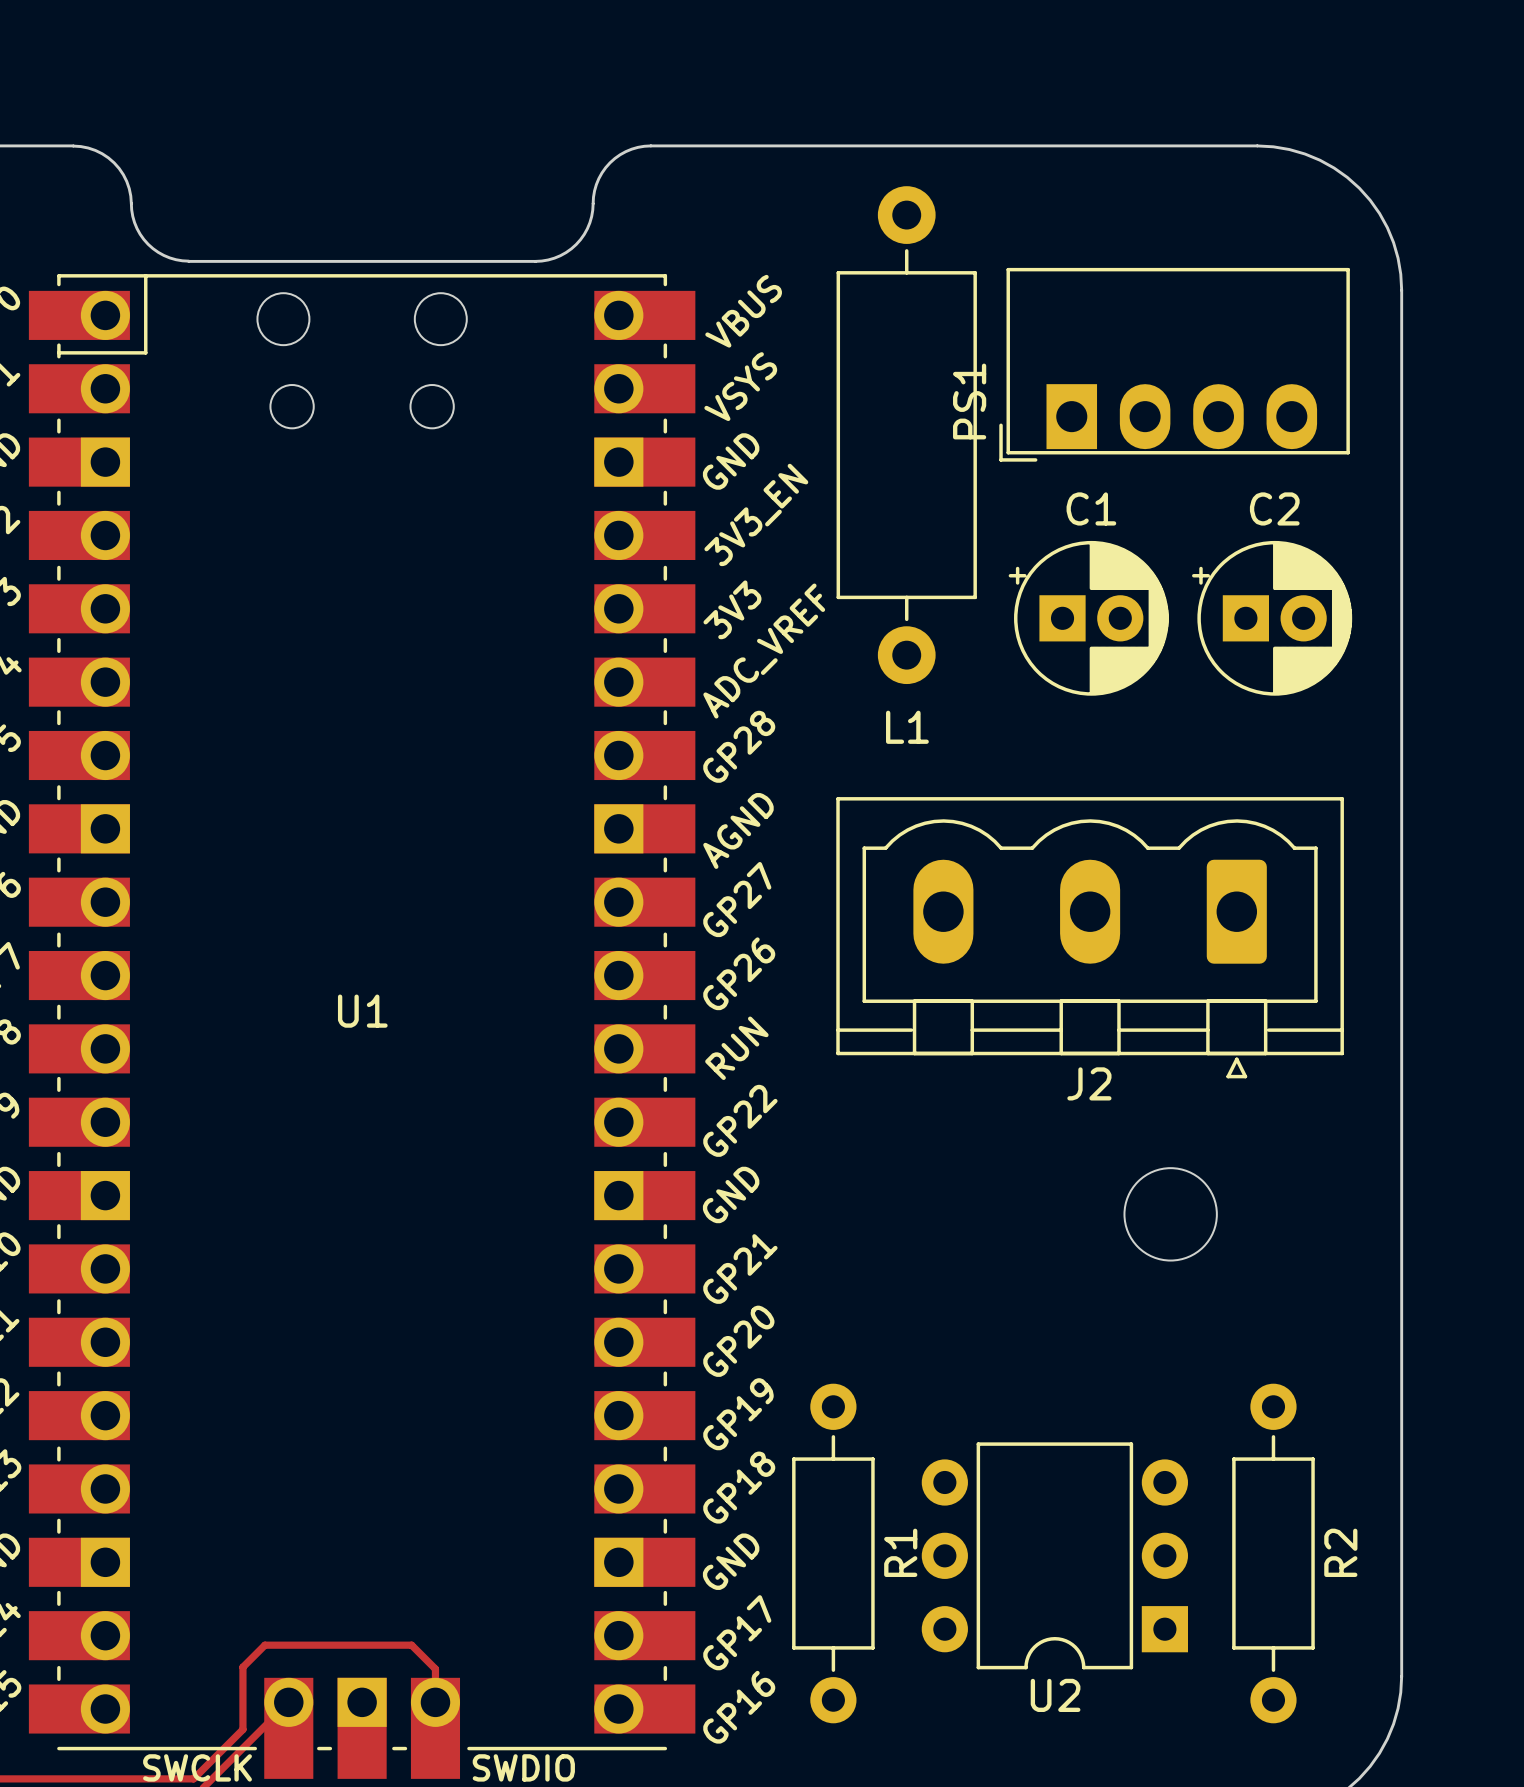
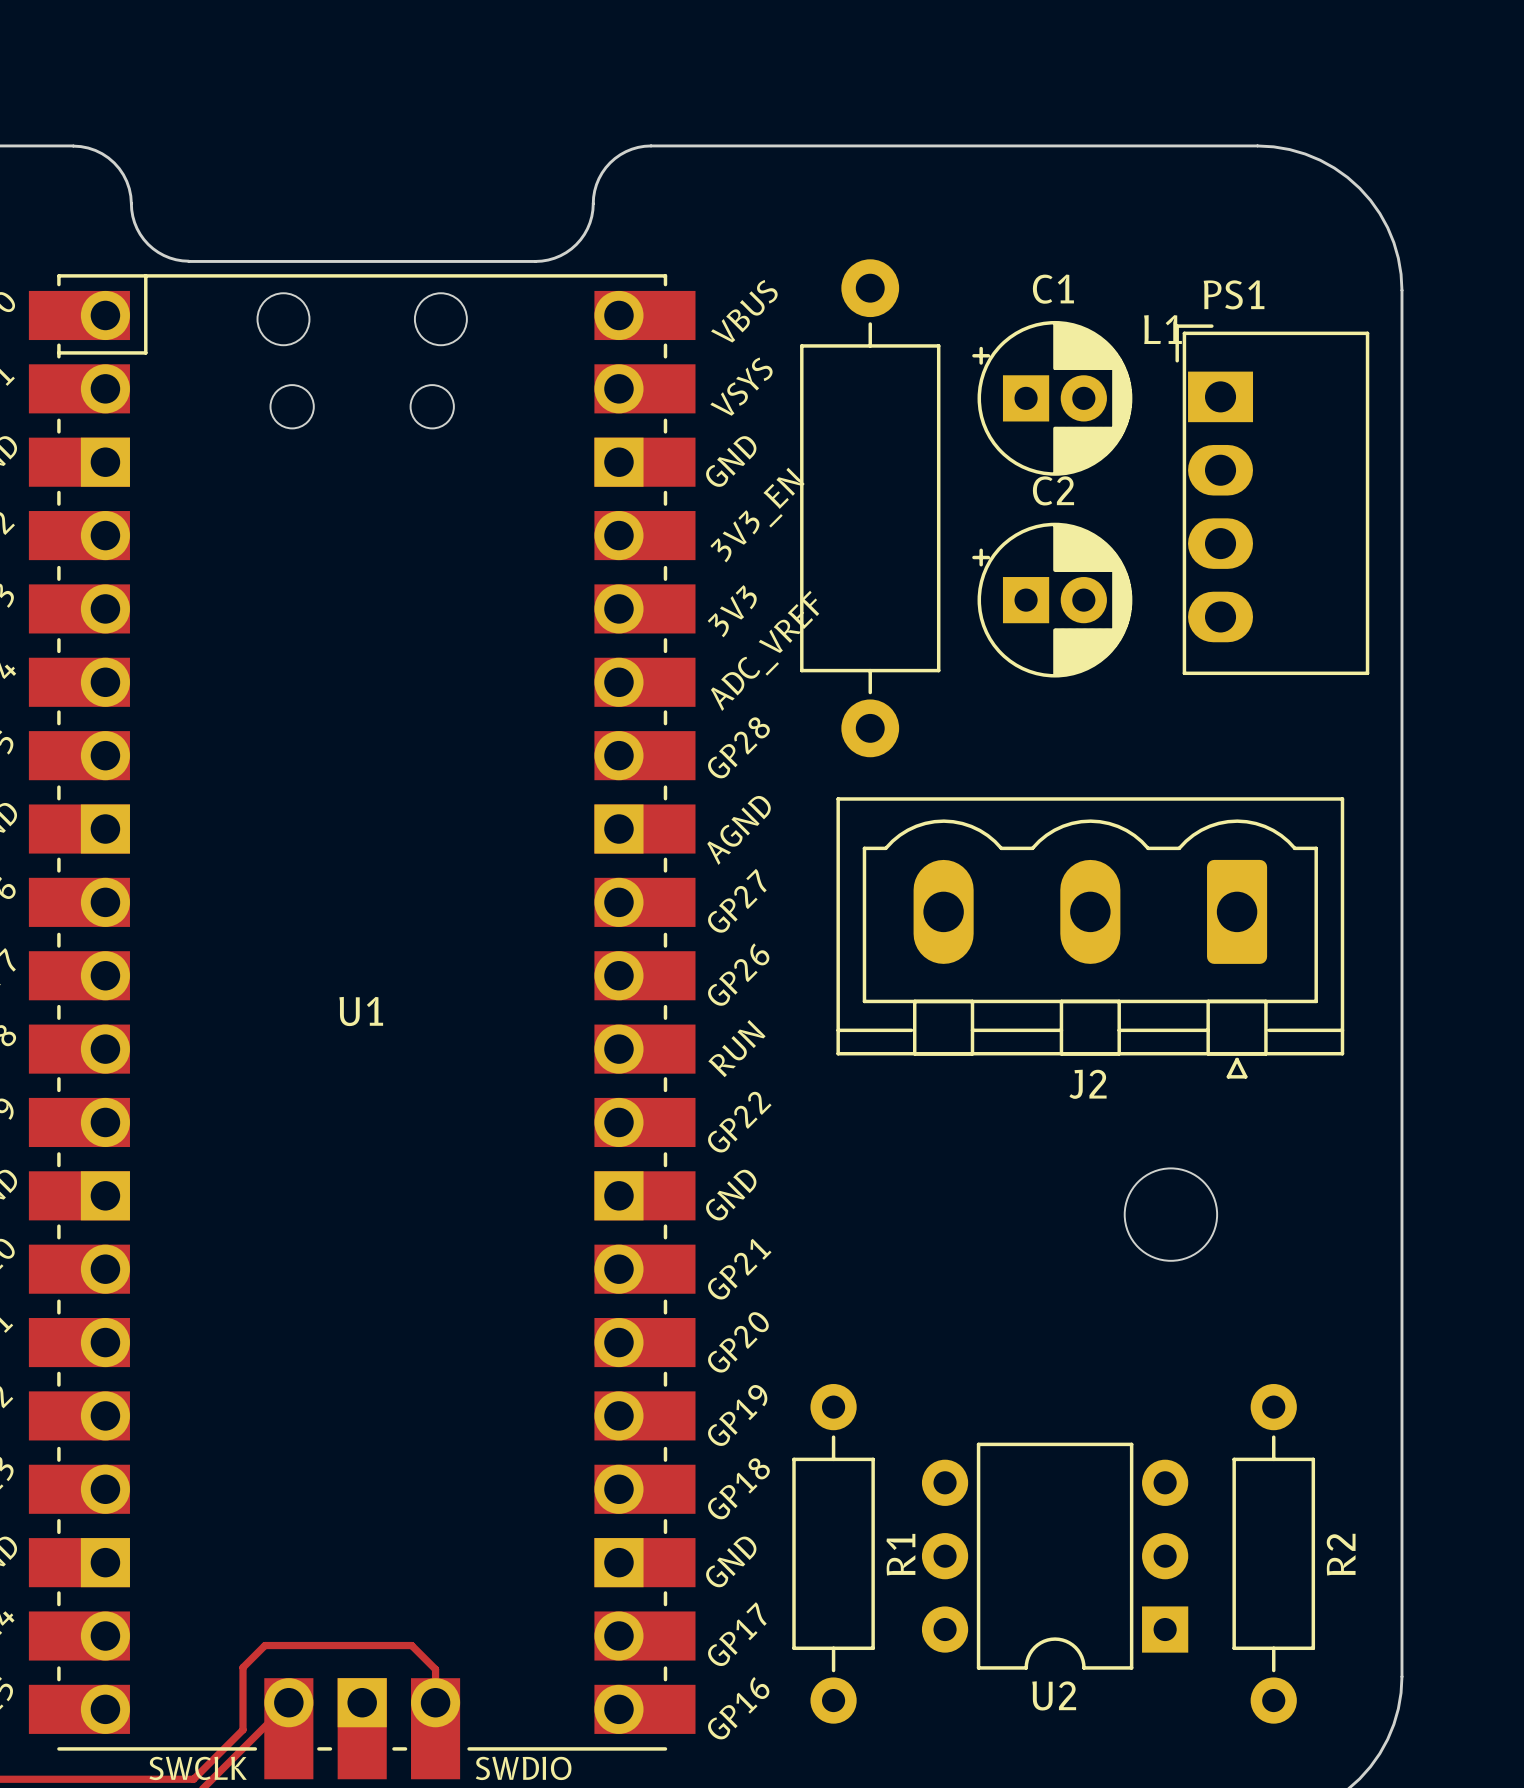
PS1 rotation: 0° (1174, 364) -> 90° clockwise (1272, 499)
L1 position: (906, 435) -> (870, 508)
C1 position: (1088, 618) -> (1052, 398)
C2 position: (1272, 618) -> (1052, 600)
L1 name position: L1 (907, 727) -> L1 (1162, 329)

